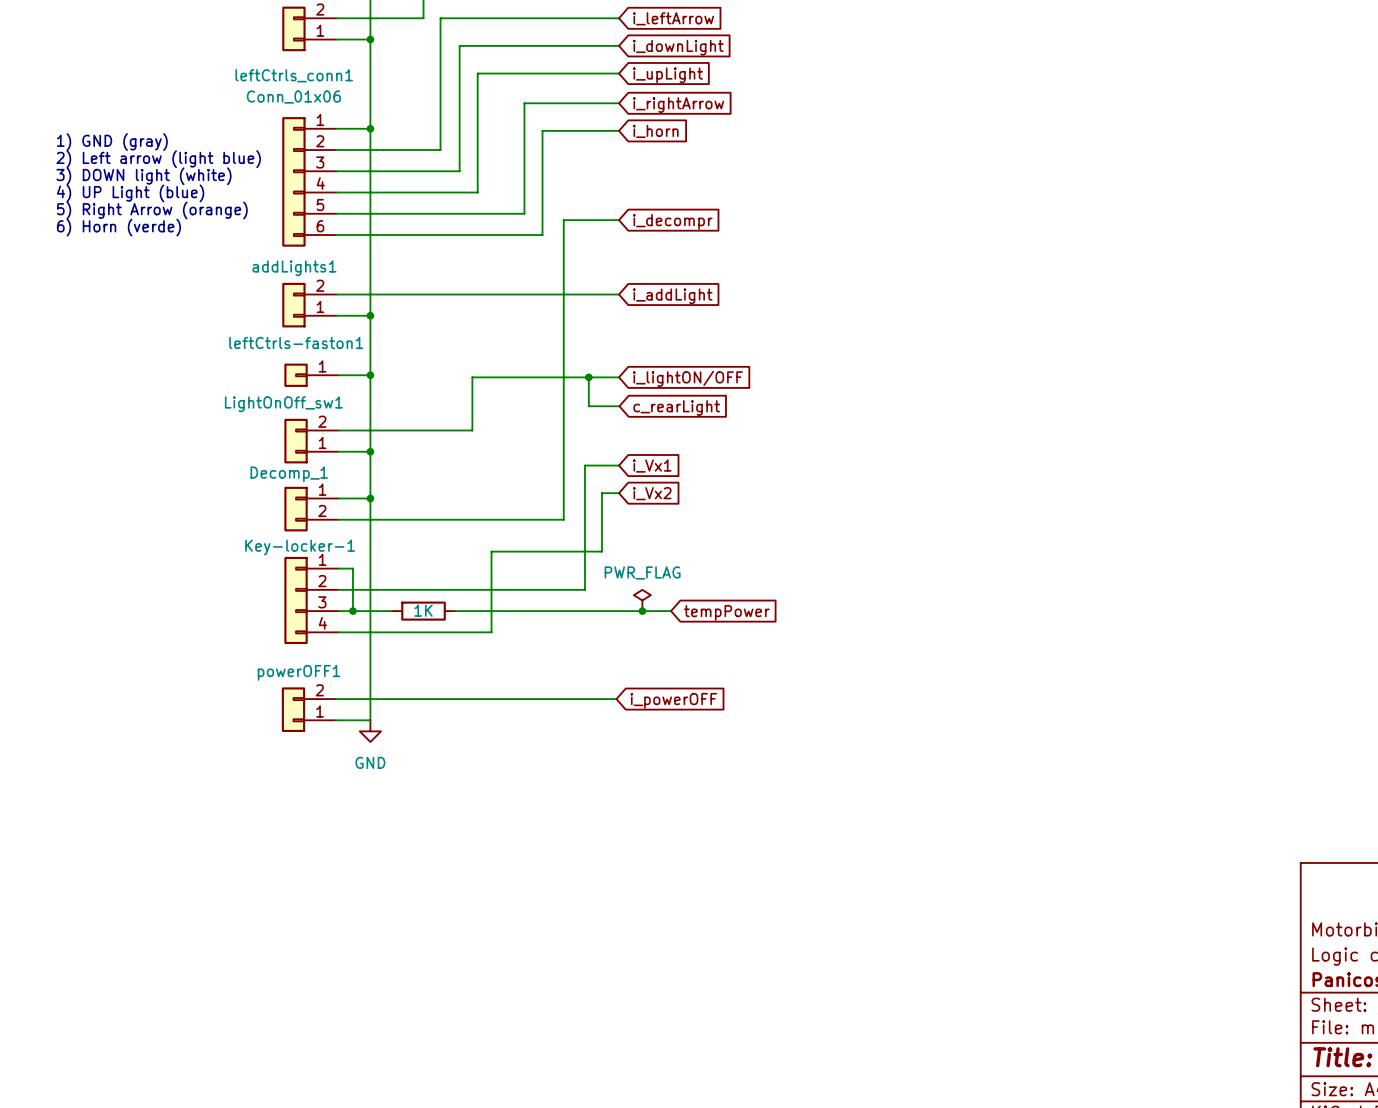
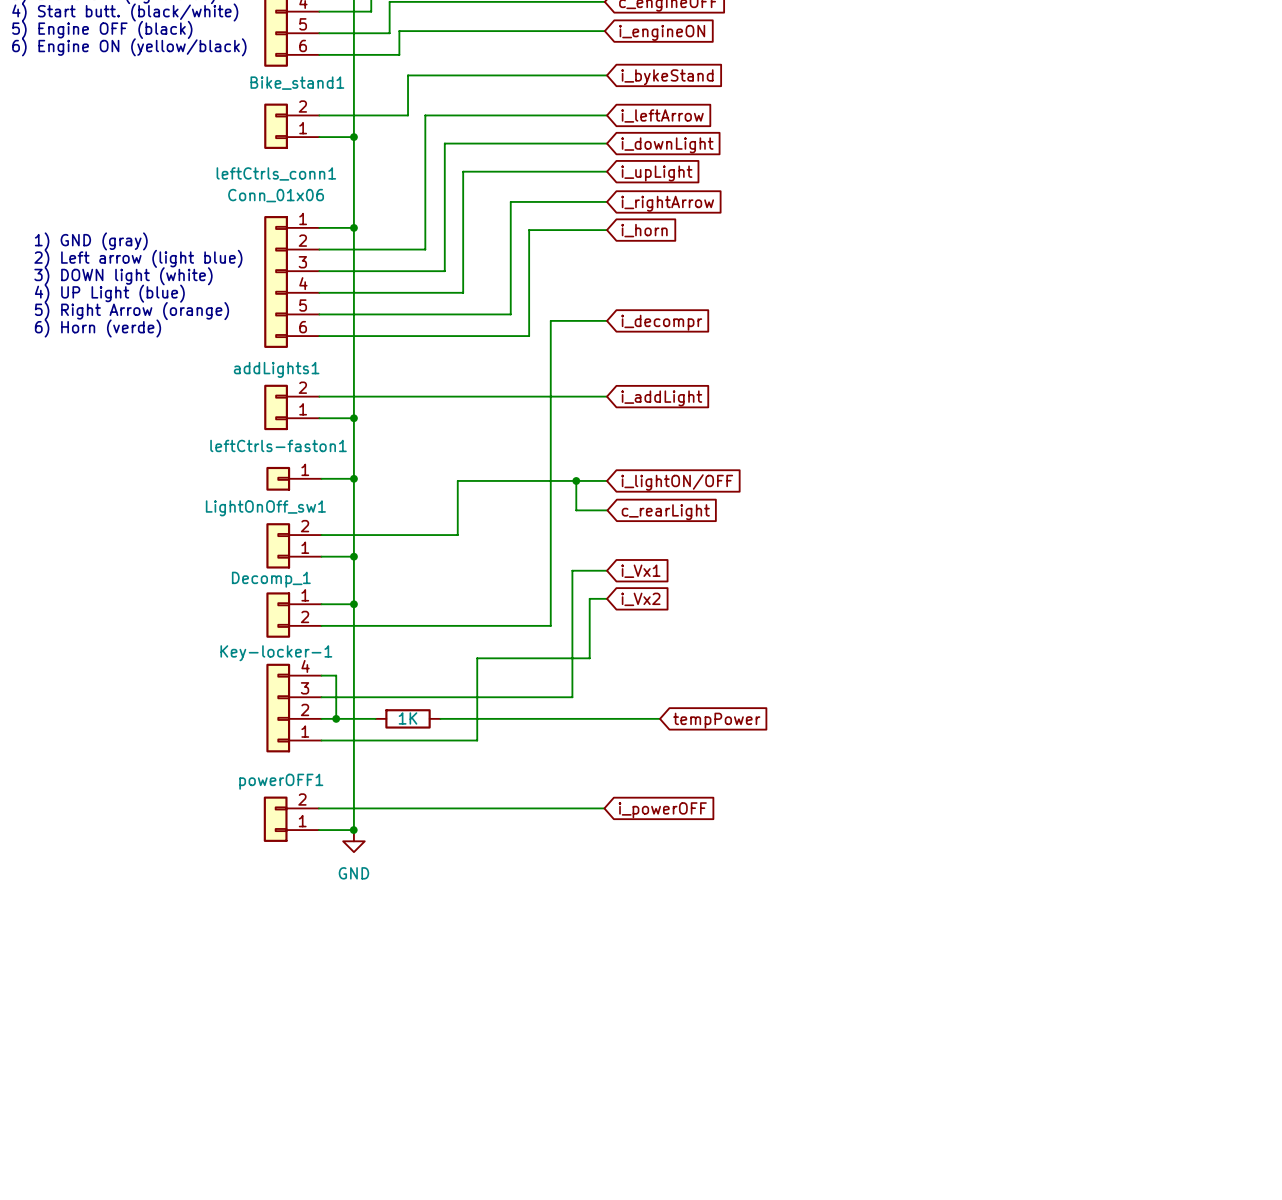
Key-locker-1 flip: as is (296, 600) -> up-down (278, 708)
power symbol: PWR_FLAG (642, 600) -> none
junction: (642, 611) -> none
junction: none -> (353, 830)

